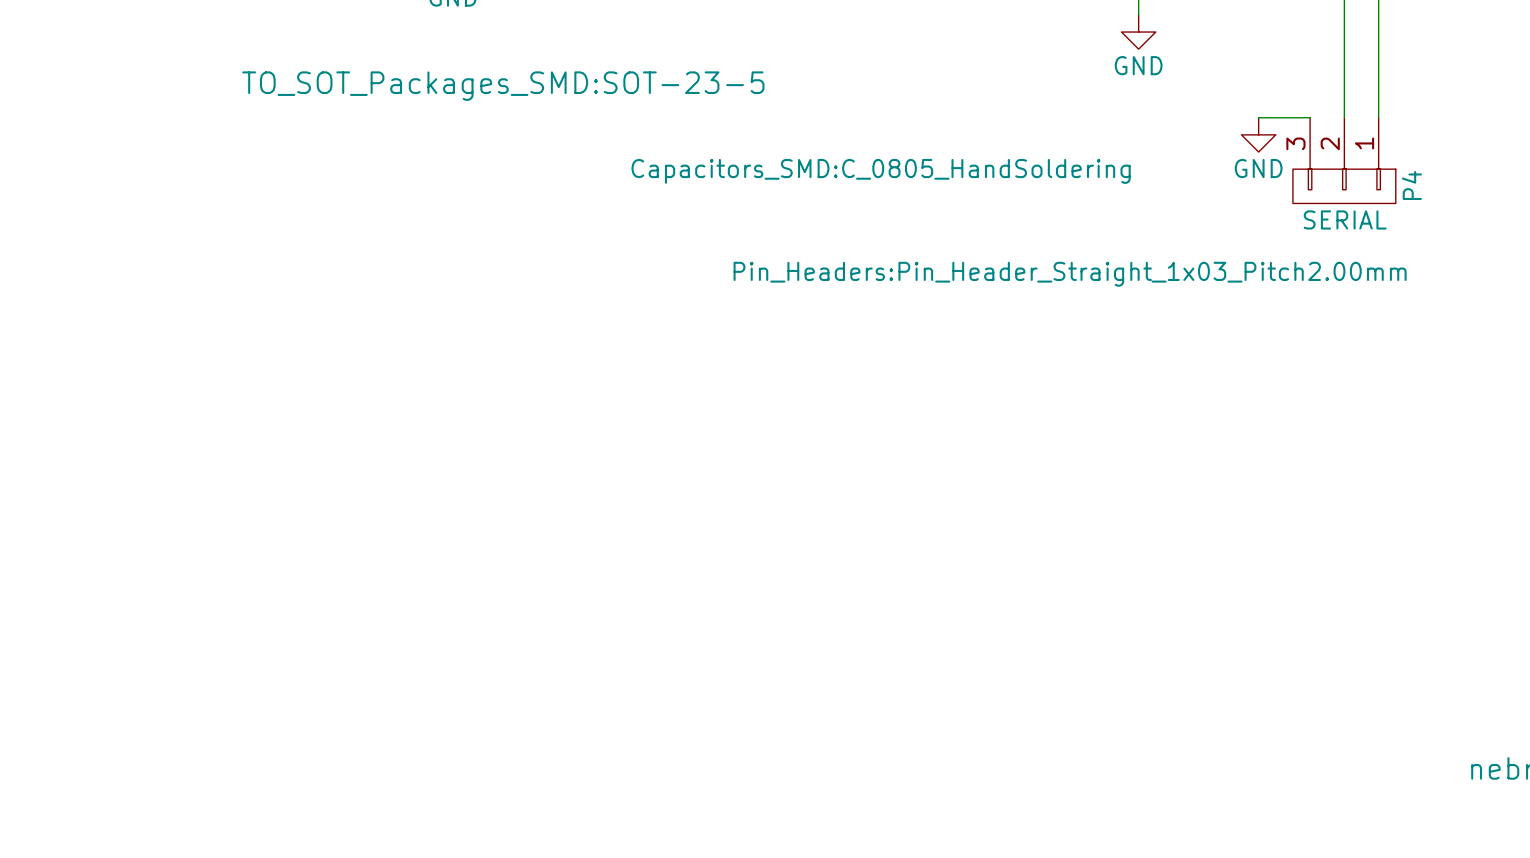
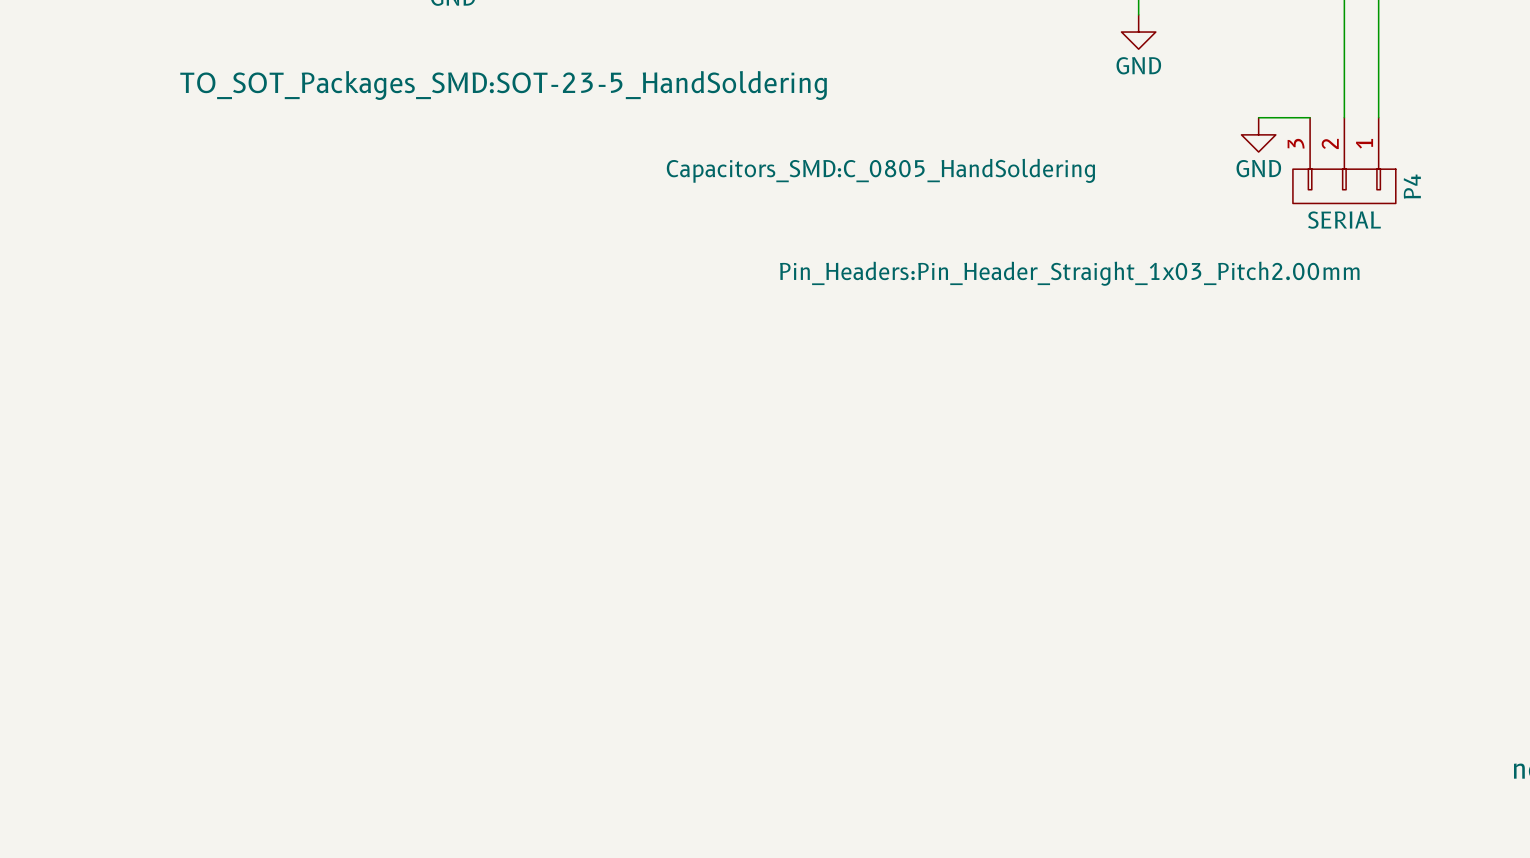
part text: TO_SOT_Packages_SMD:SOT-23-5 (503, 86) -> TO_SOT_Packages_SMD:SOT-23-5_HandSoldering (503, 85)

